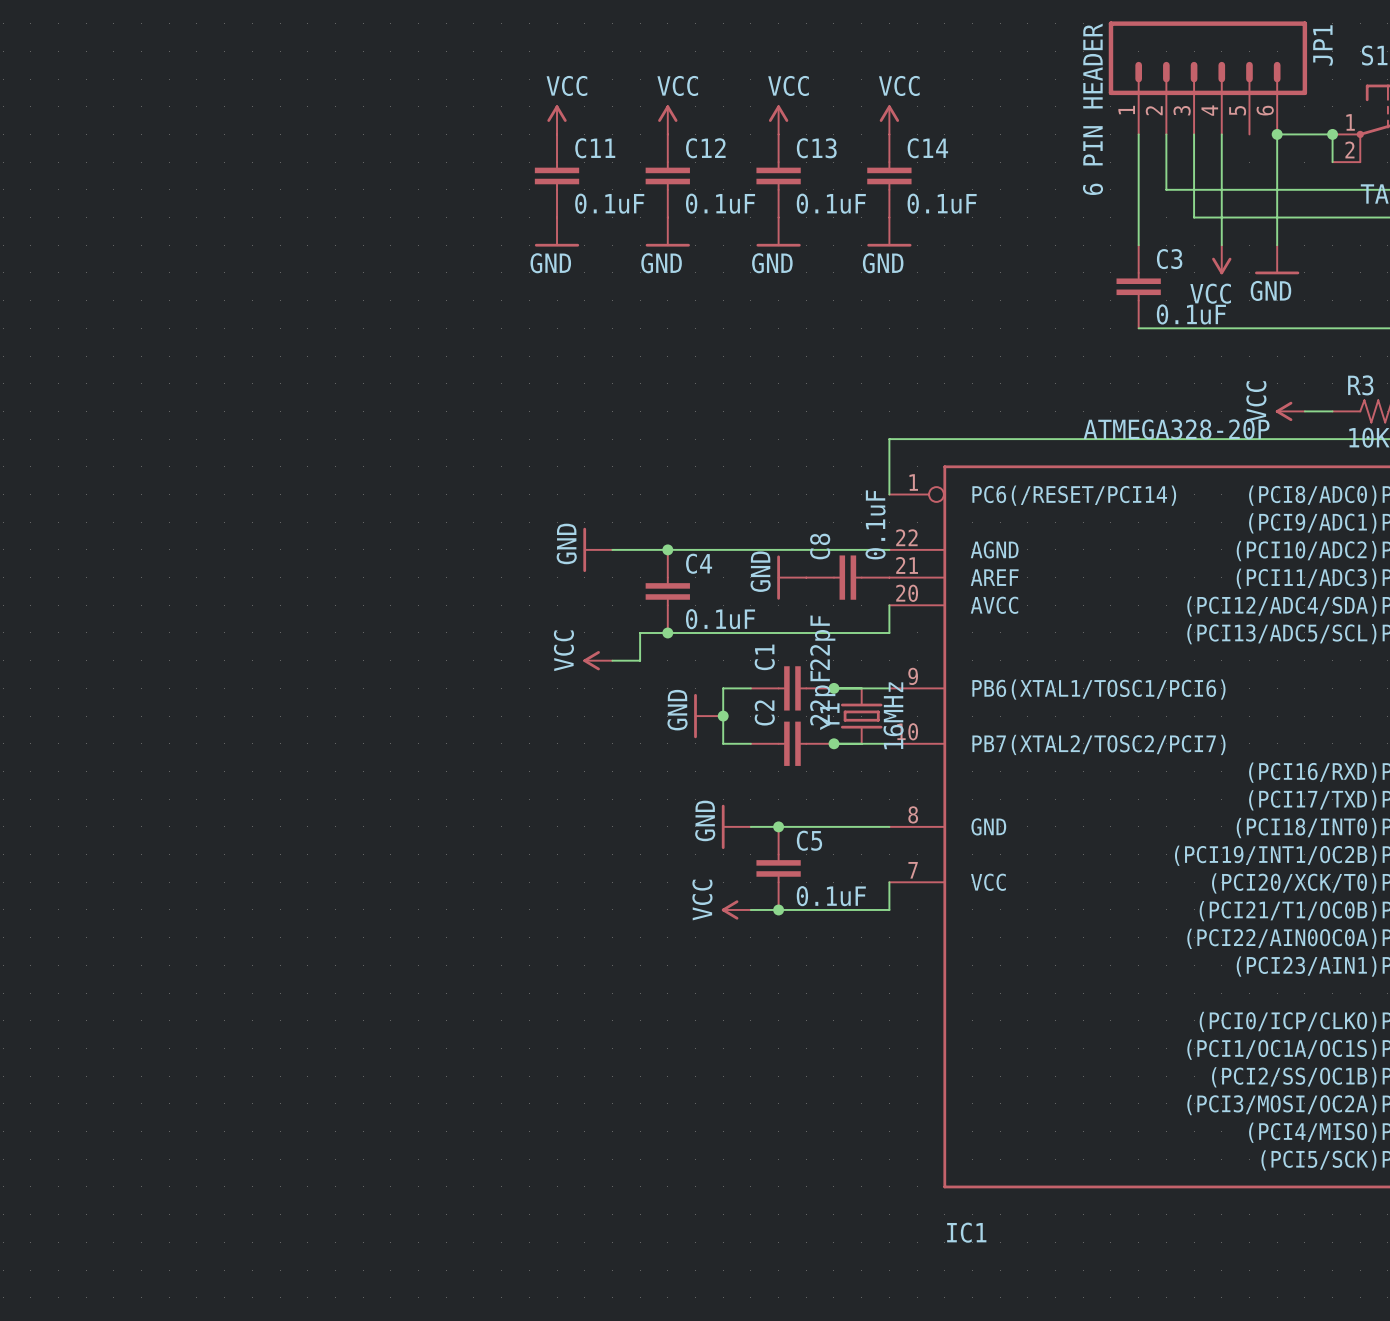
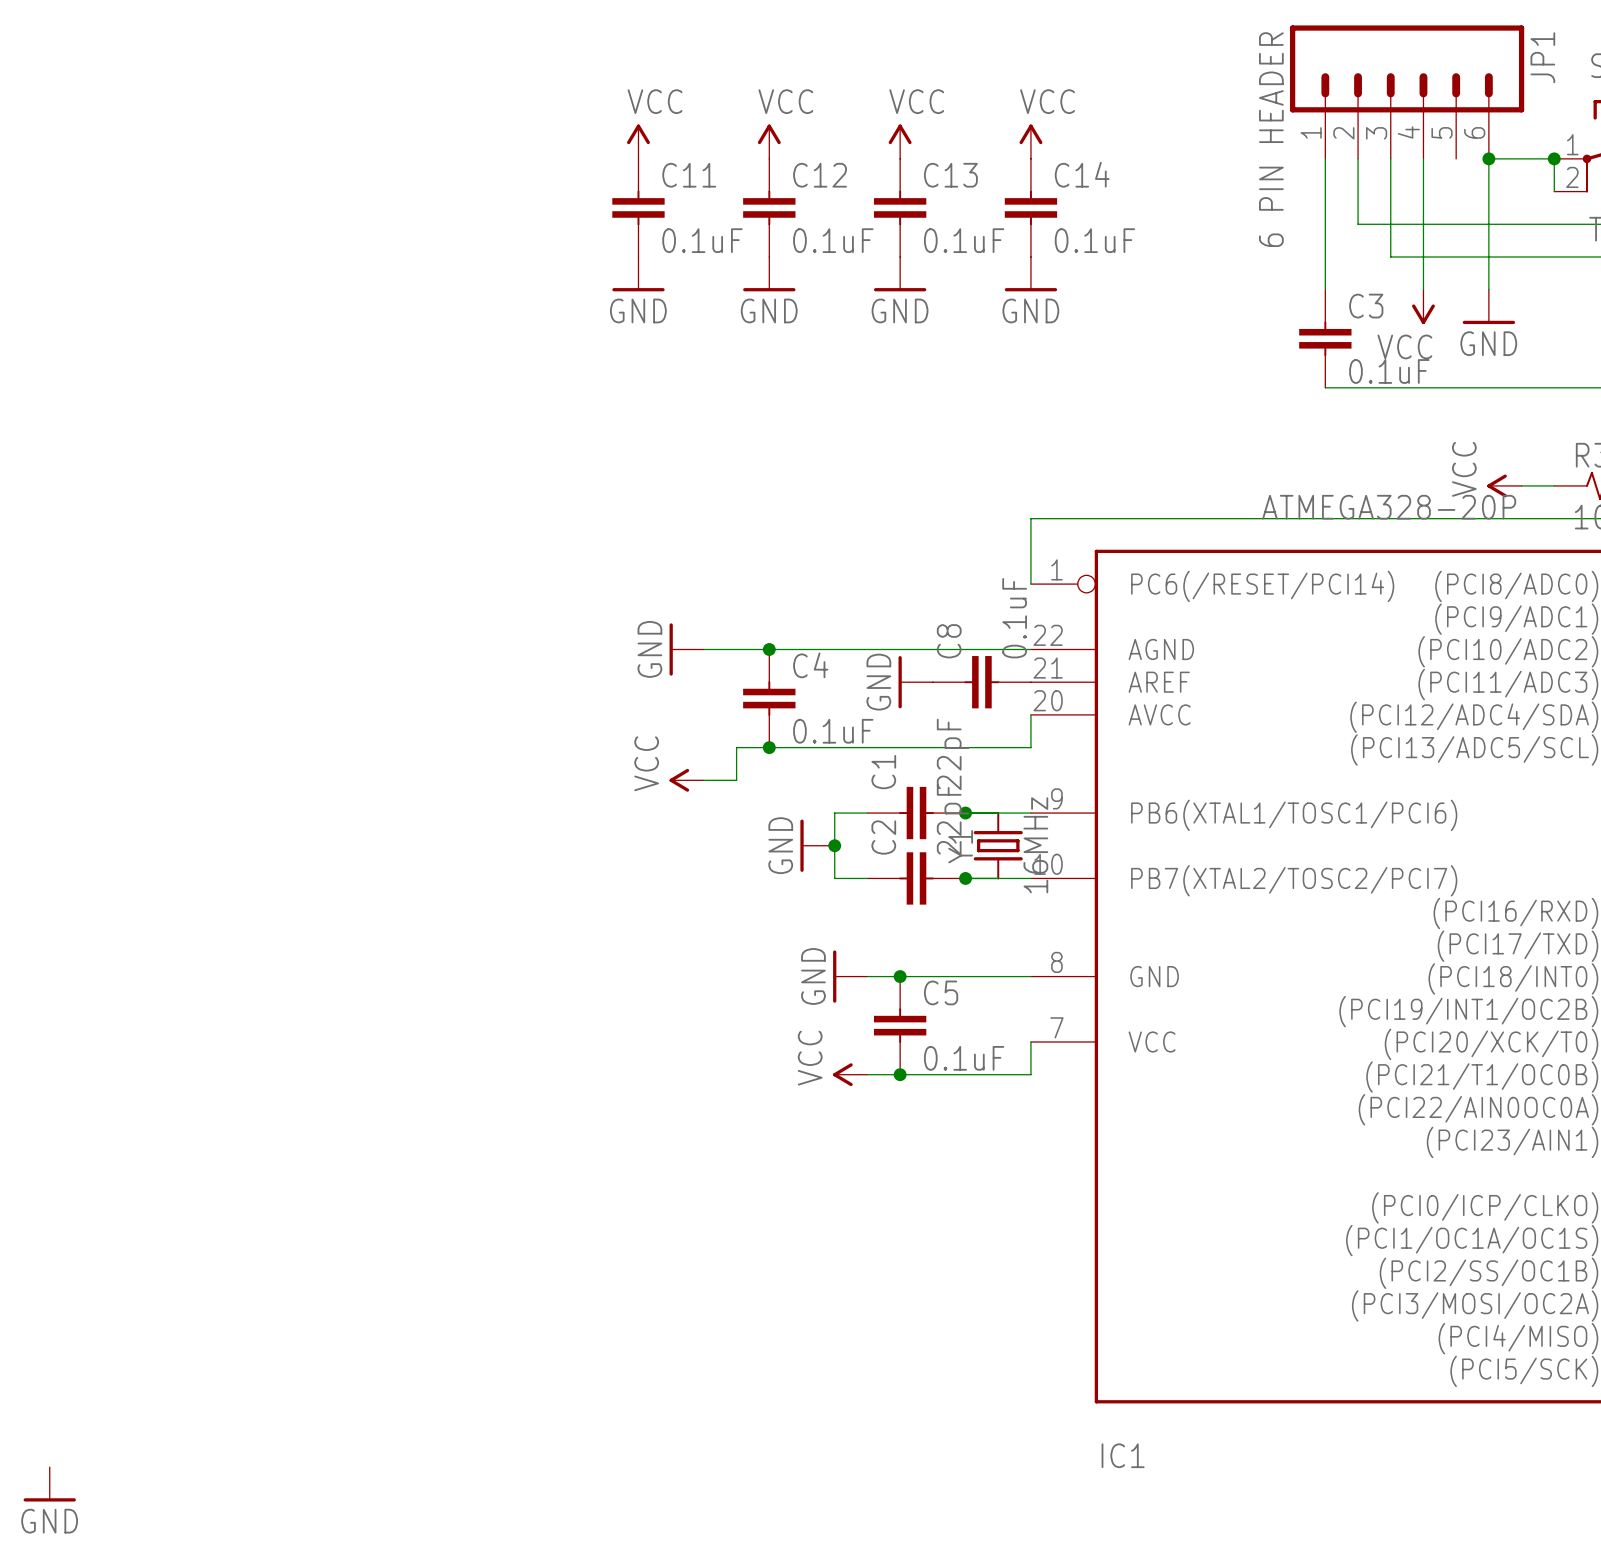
power symbol: none -> GND (49, 1484)

